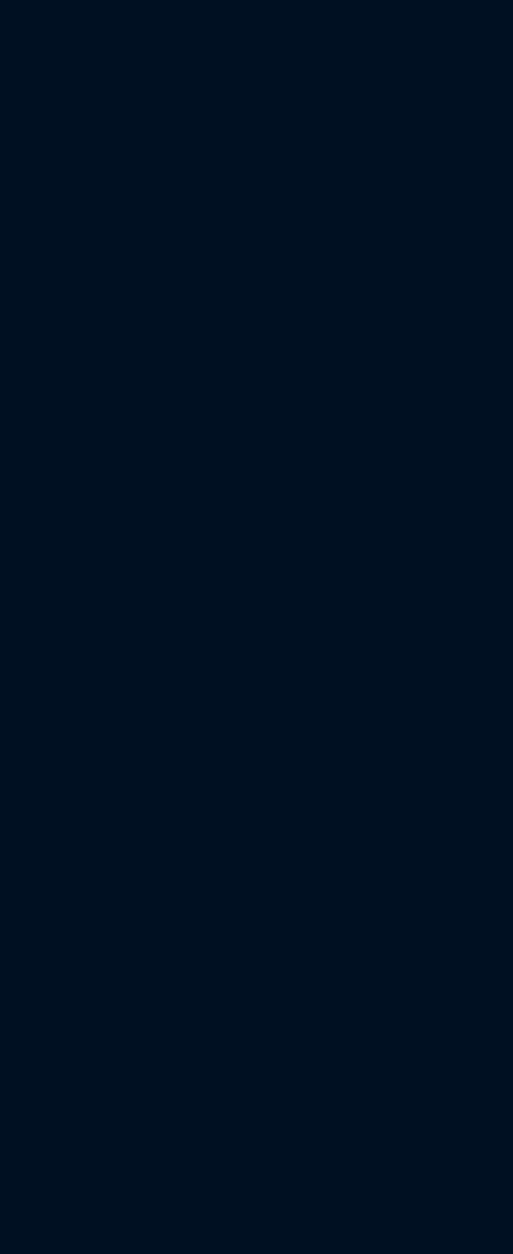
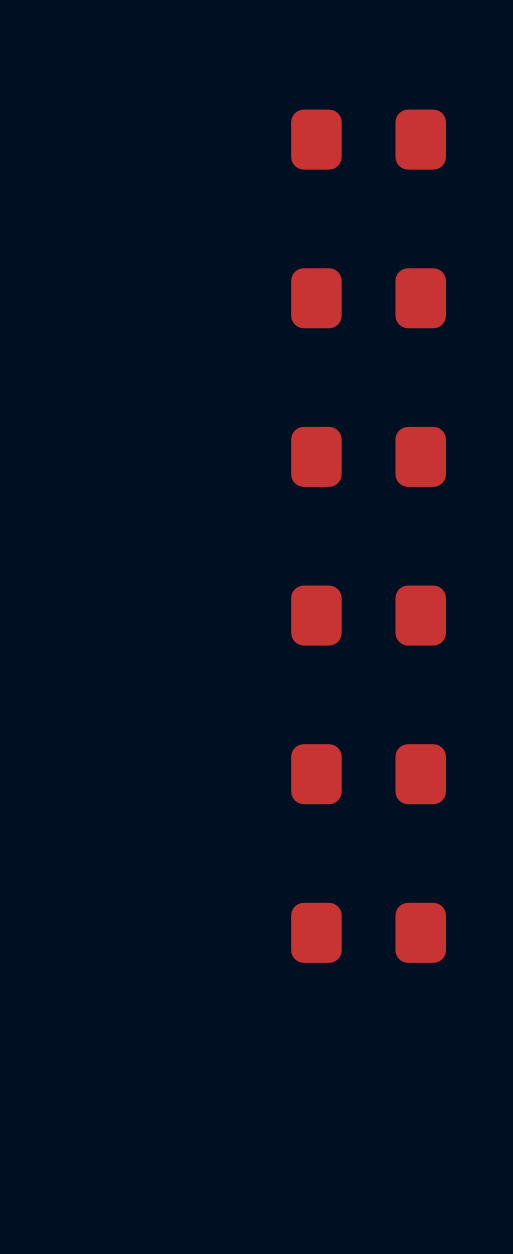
part: none -> (368, 139)
part: none -> (368, 298)
part: none -> (368, 456)
part: none -> (368, 615)
part: none -> (368, 774)
part: none -> (368, 932)

